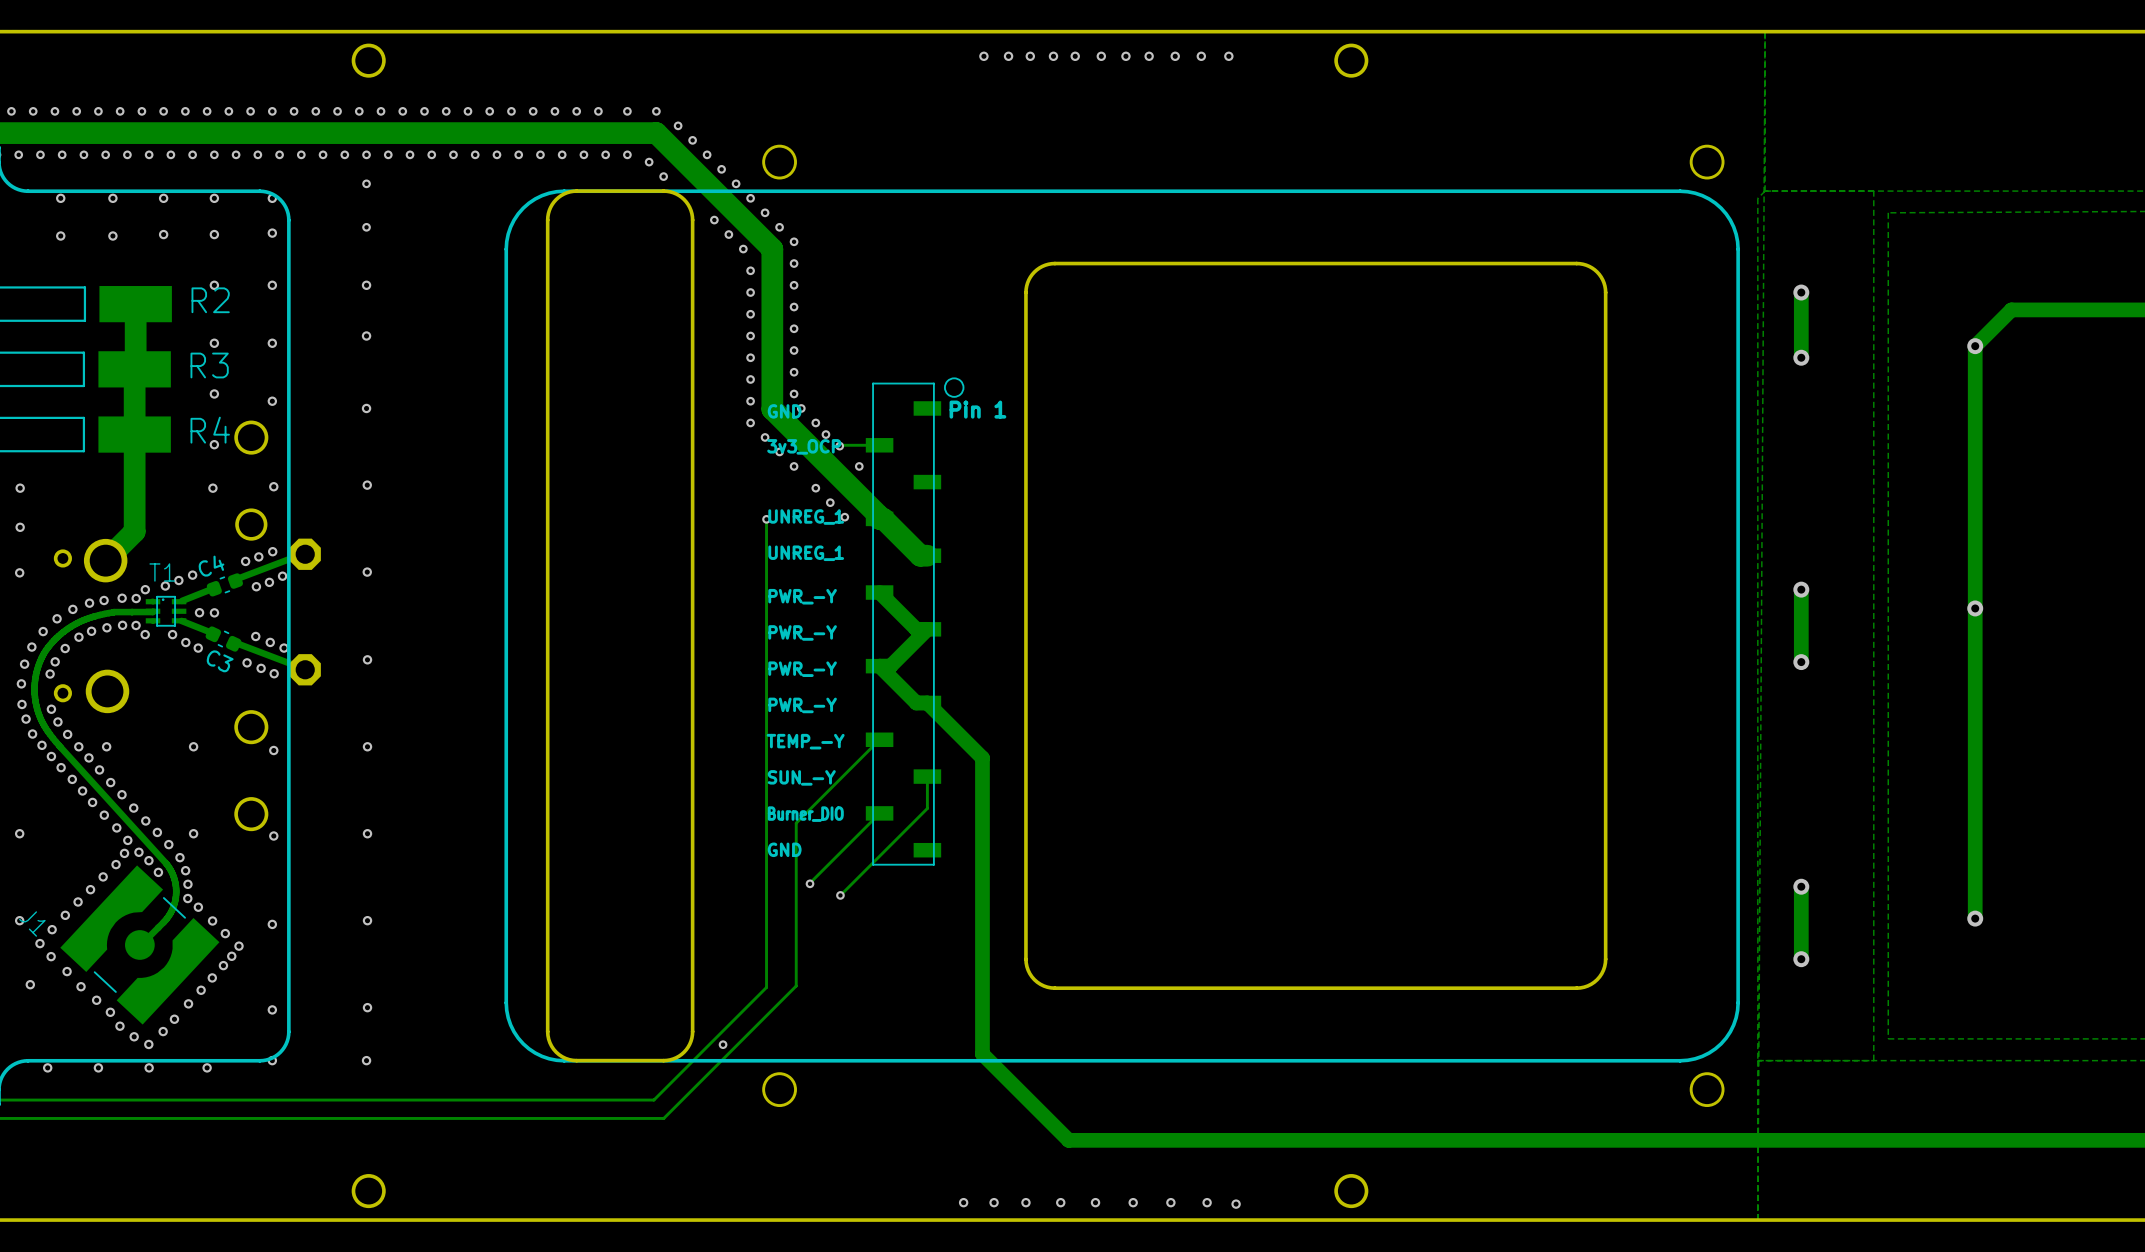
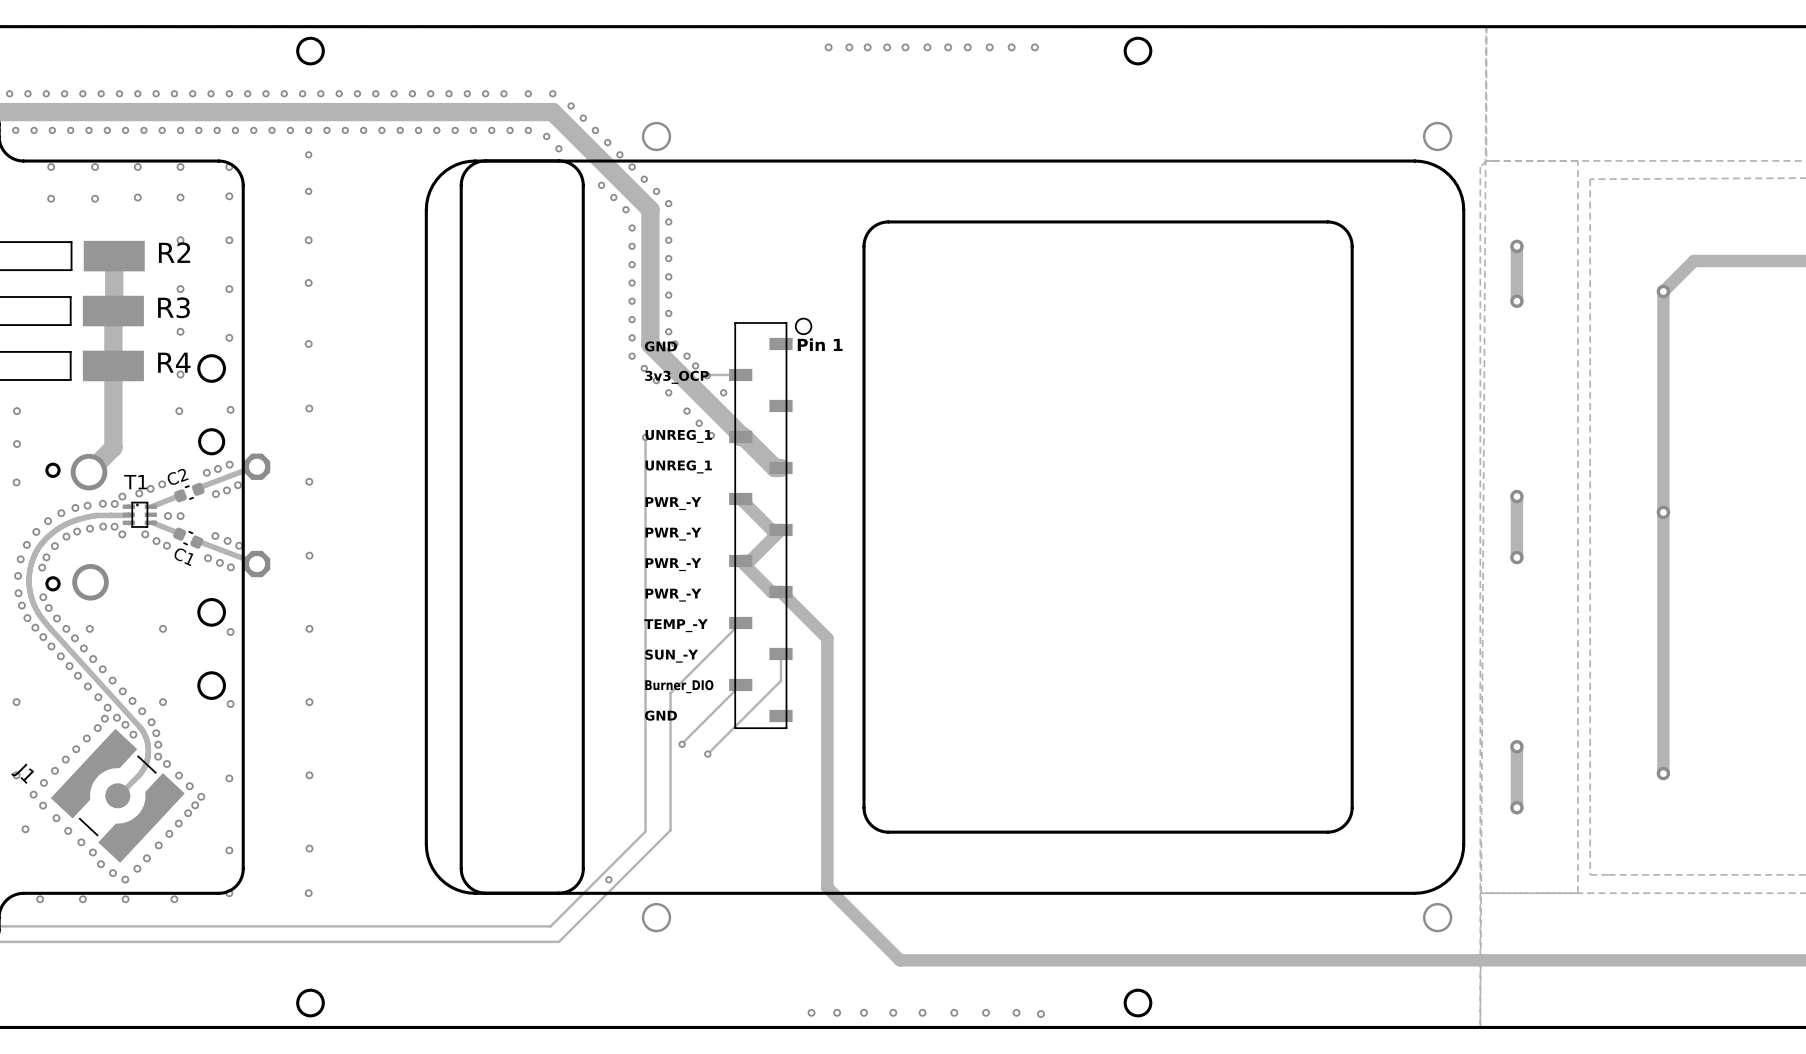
C4 name: C4 (211, 566) -> C2 (177, 476)
C3 name: C3 (220, 661) -> C1 (183, 557)

